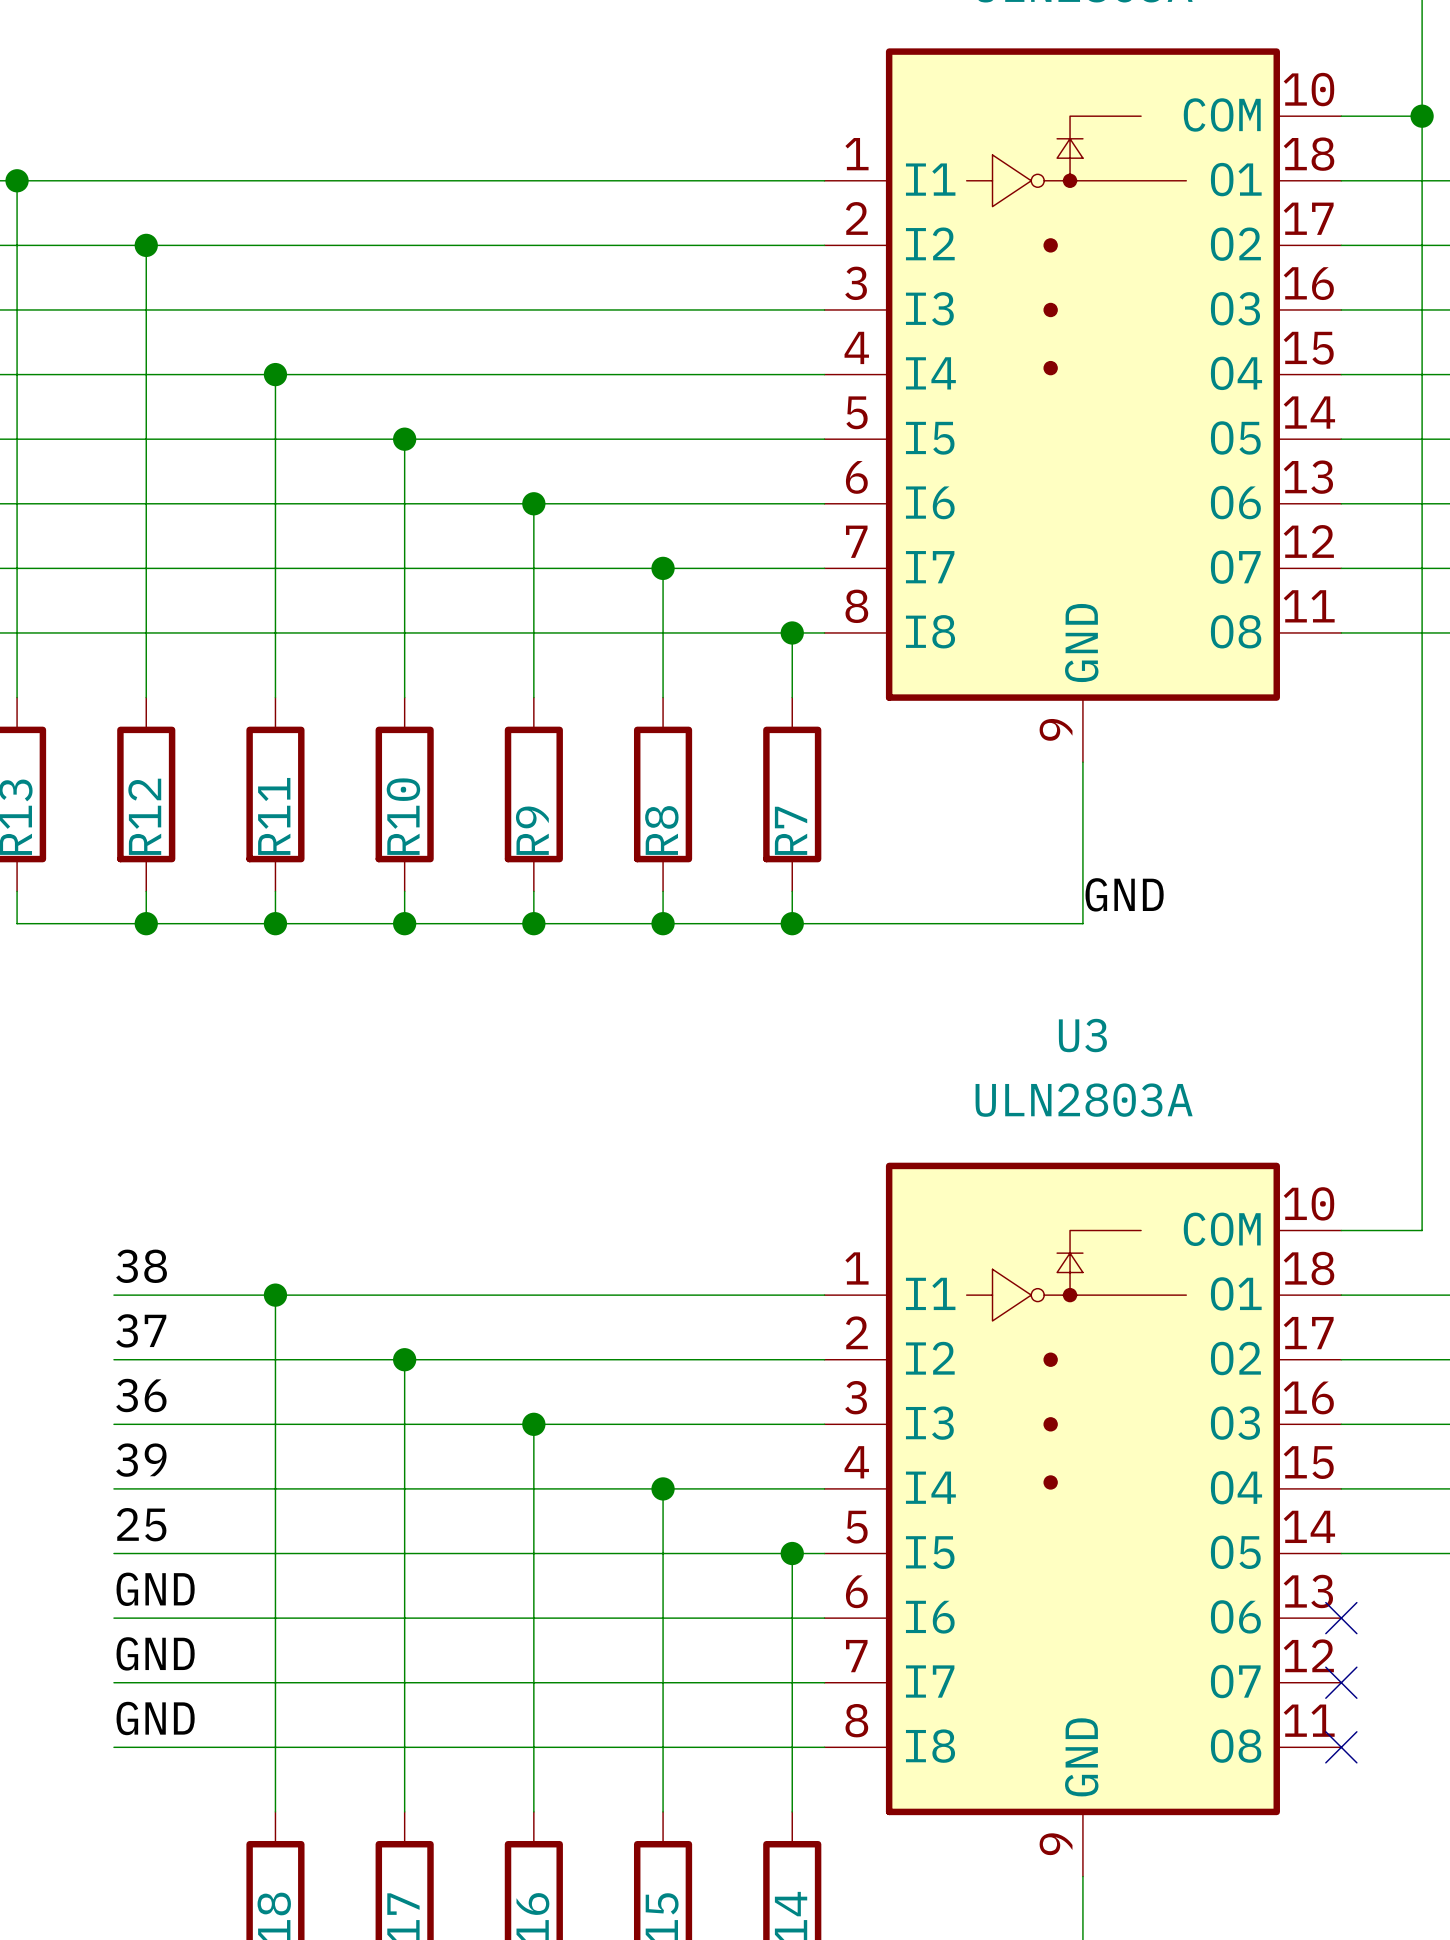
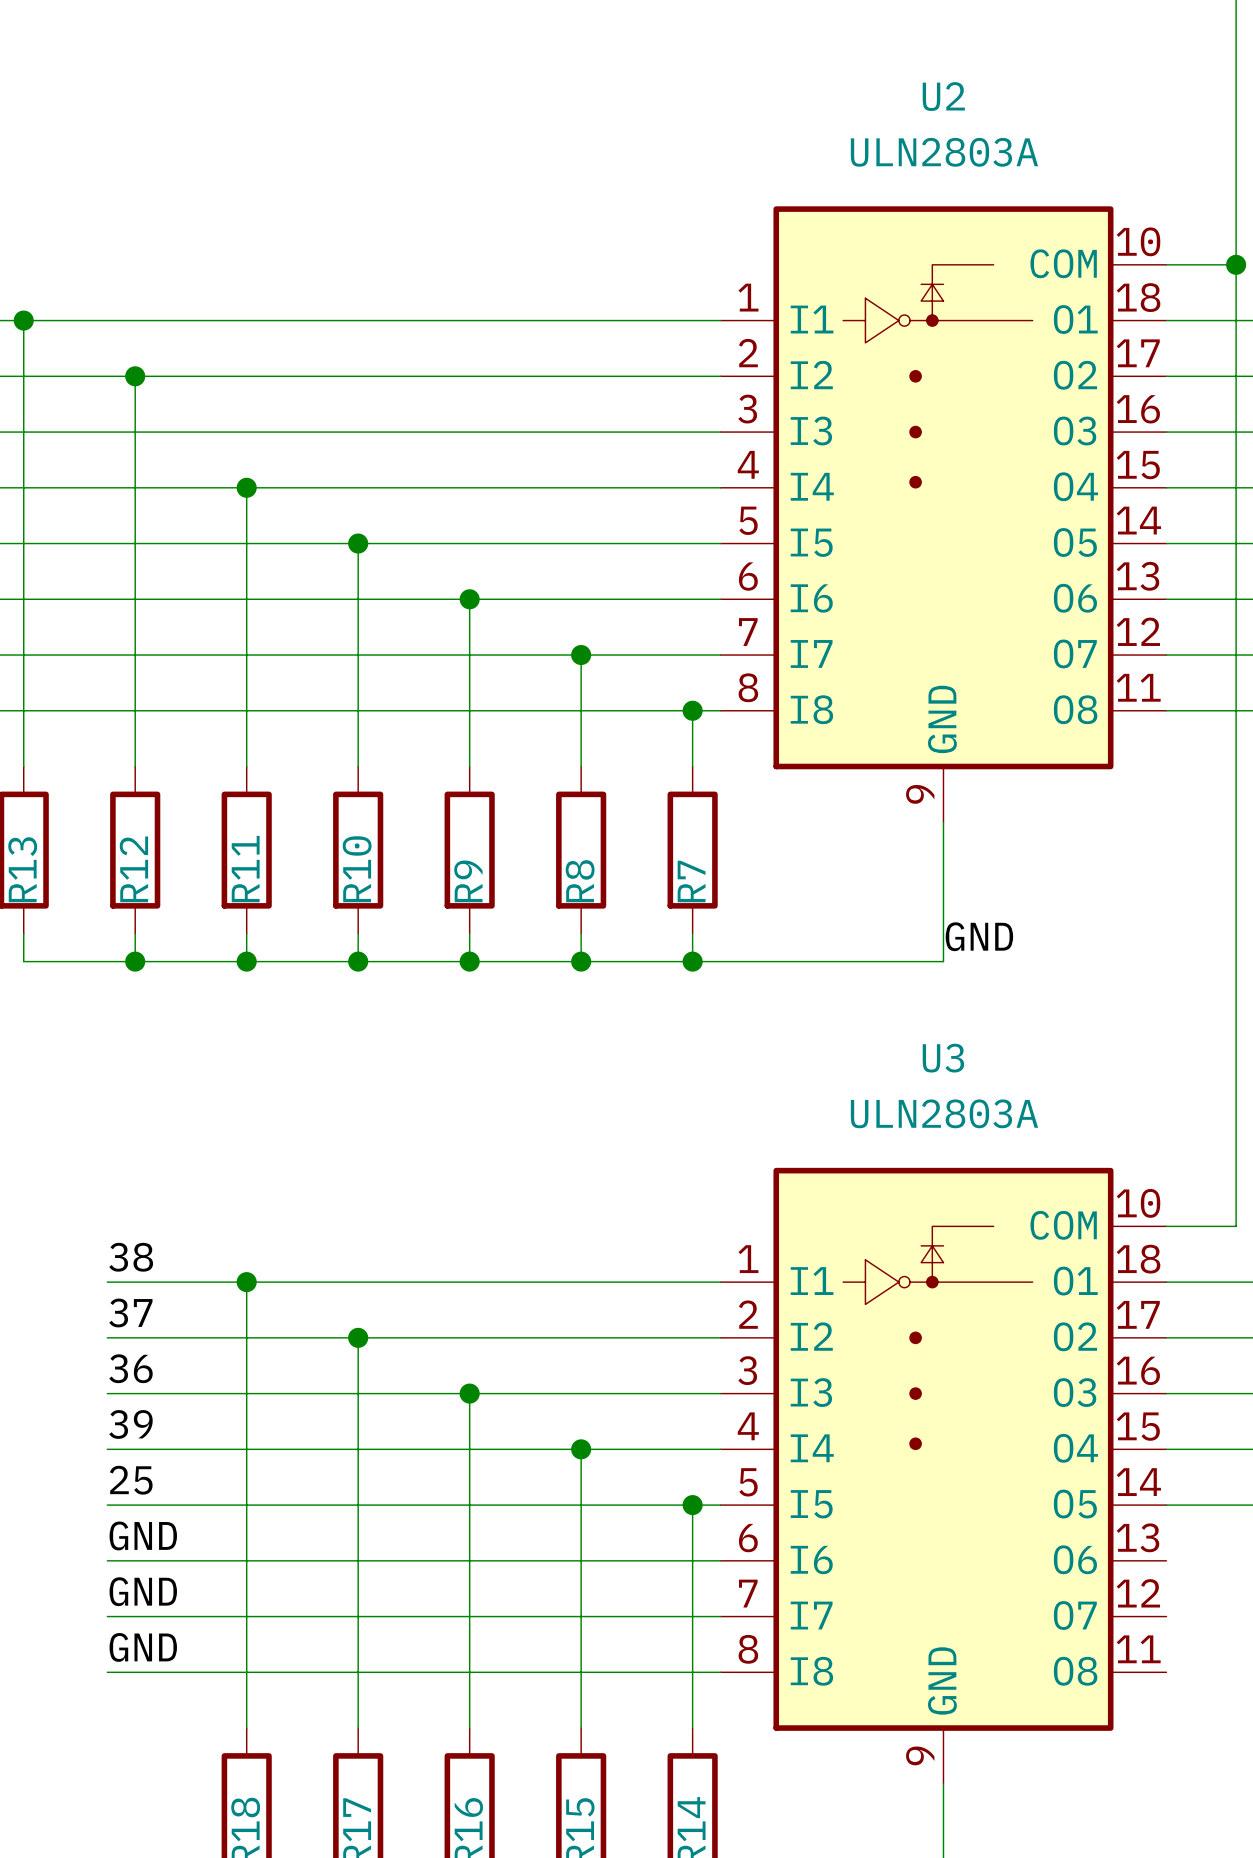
no-connect mark: (1341, 1618) -> none
no-connect mark: (1341, 1682) -> none
no-connect mark: (1341, 1747) -> none

